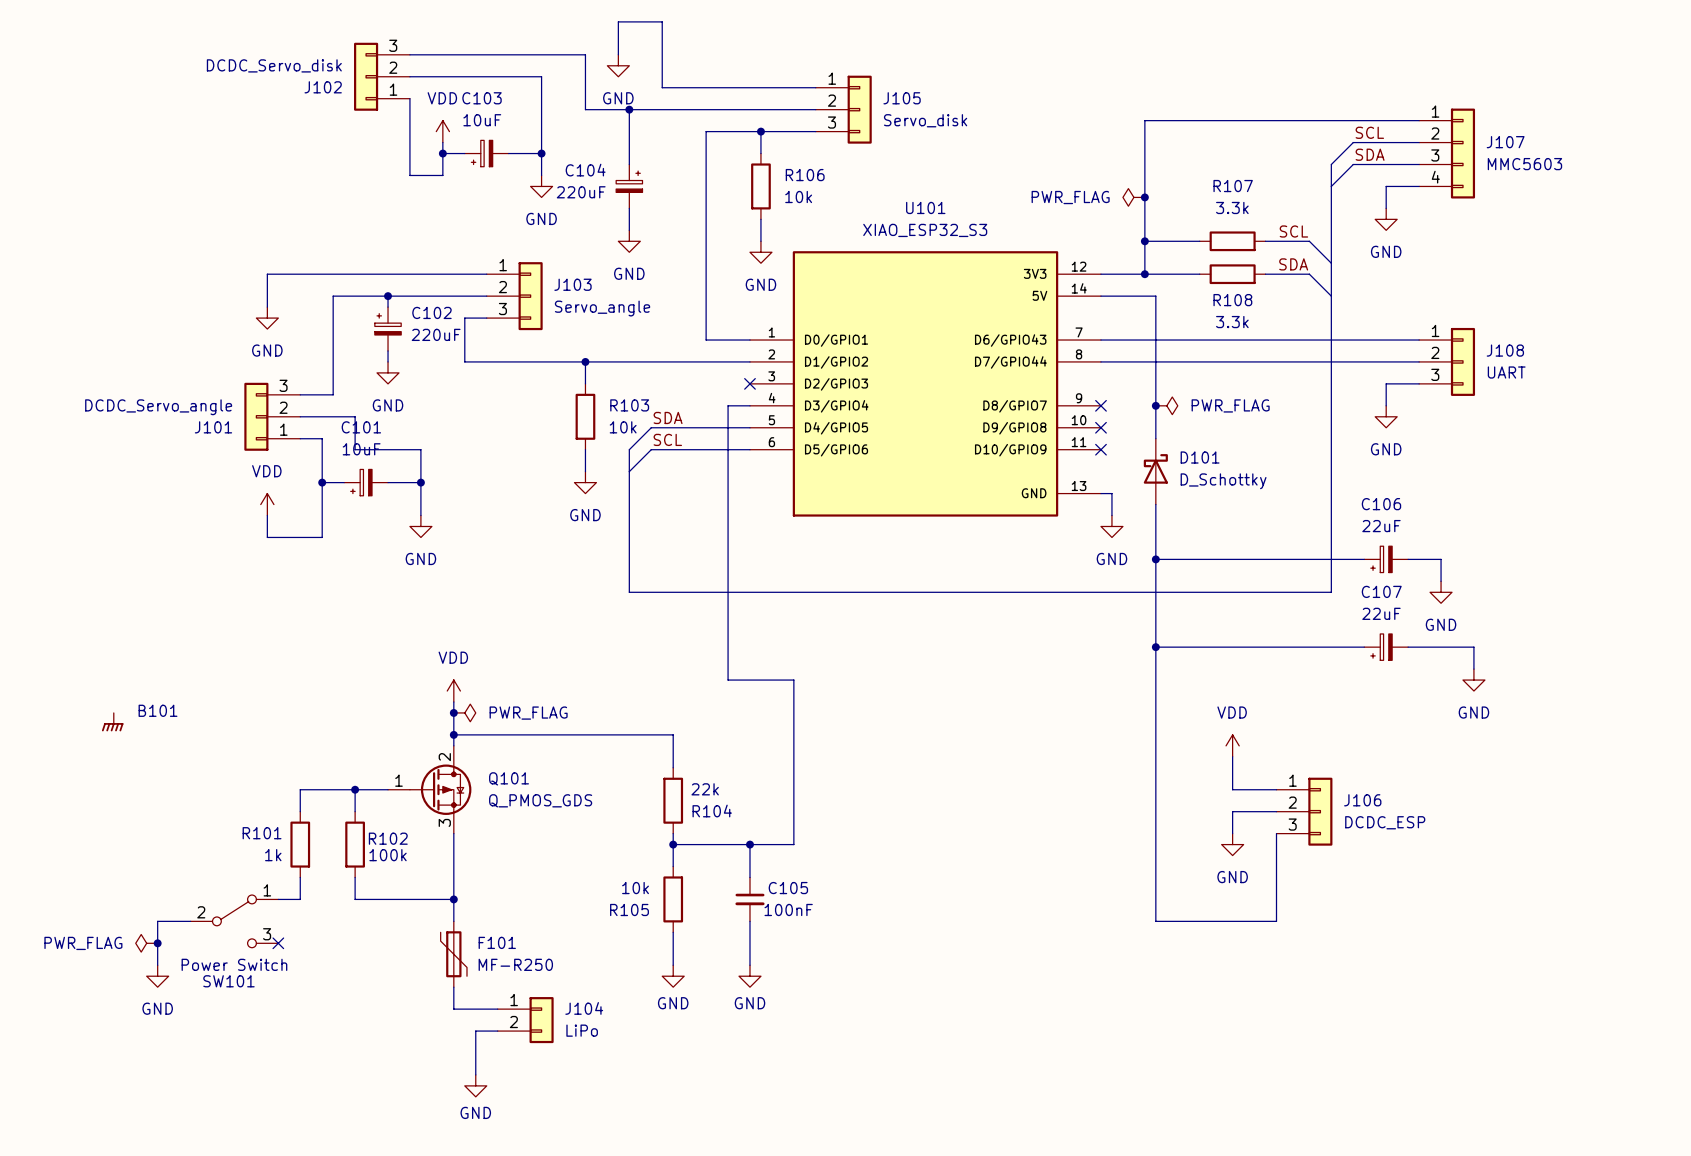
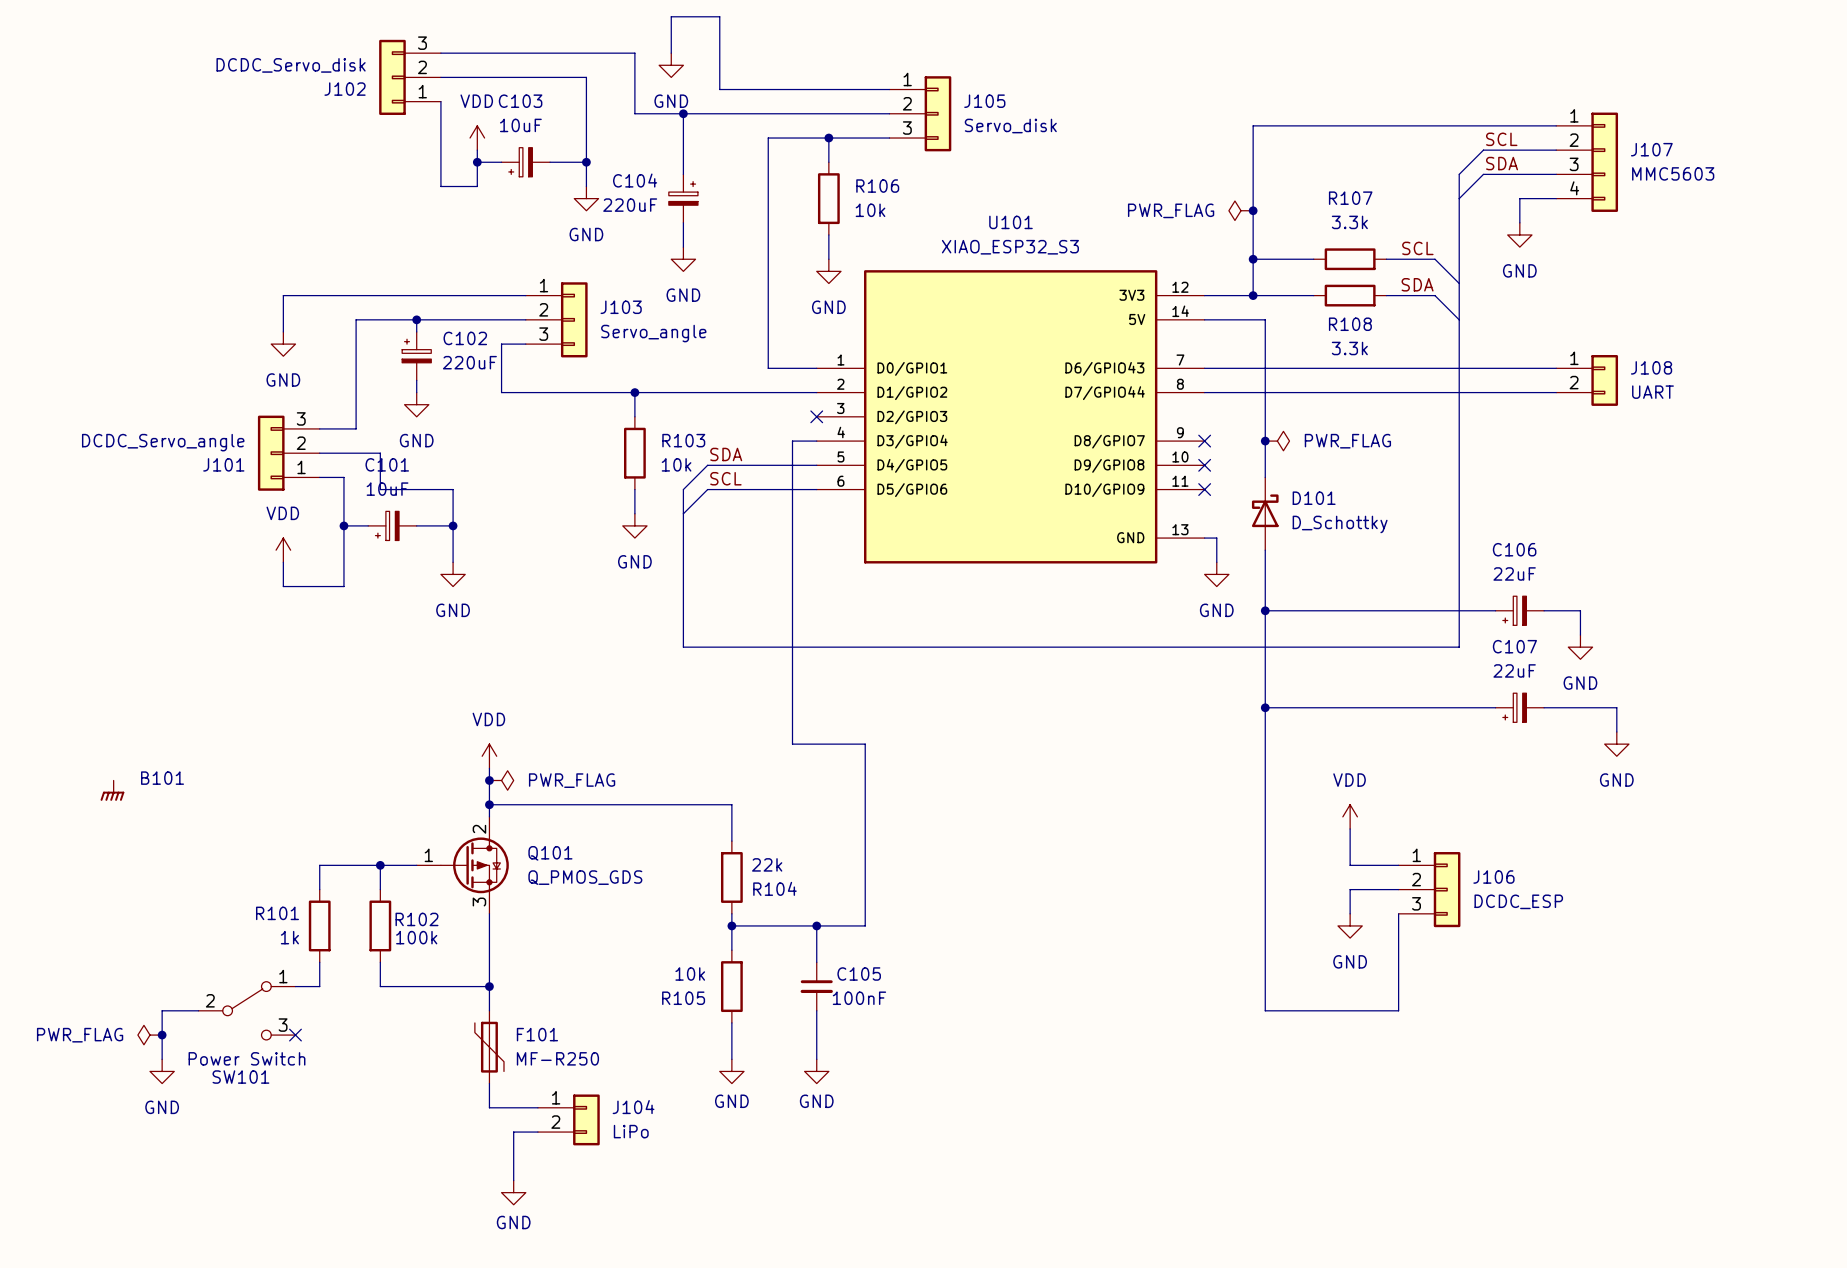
J108 symbol: [1419, 327, 1476, 396] -> [1556, 355, 1619, 406]
wire: (1419, 383) (1386, 383) (1386, 405) -> none
power symbol: GND (1386, 416) -> none

